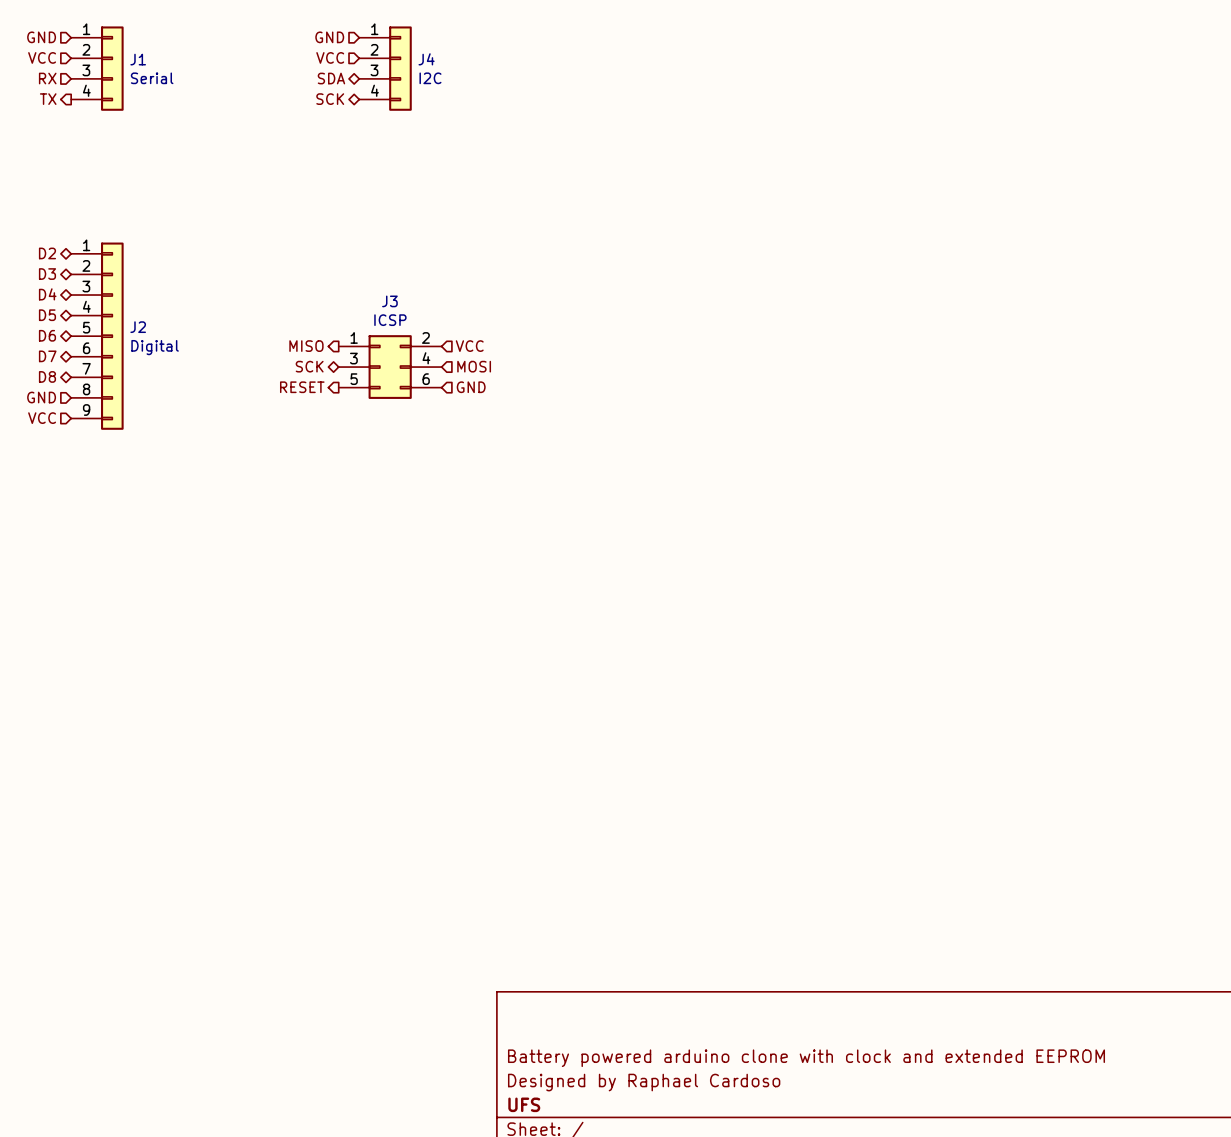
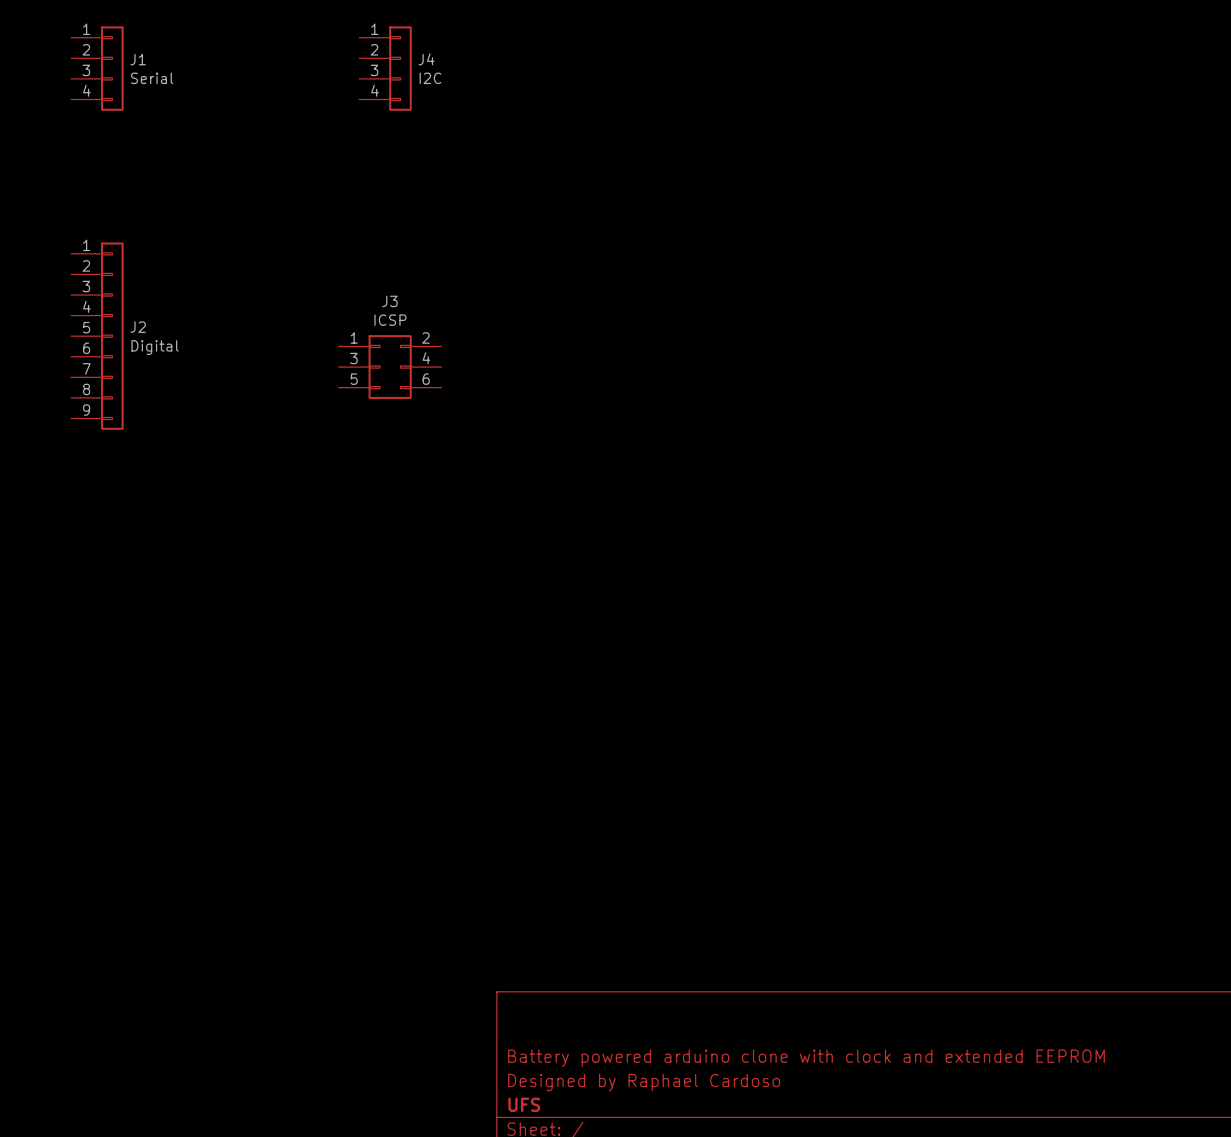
hierarchical label: GND (41, 37) -> none
hierarchical label: GND (329, 37) -> none
hierarchical label: VCC (42, 57) -> none
hierarchical label: VCC (330, 57) -> none
hierarchical label: RX (47, 78) -> none
hierarchical label: SDA (331, 78) -> none
hierarchical label: TX (48, 99) -> none
hierarchical label: SCK (330, 99) -> none
hierarchical label: D2 (47, 253) -> none
hierarchical label: D3 (47, 274) -> none
hierarchical label: D4 (47, 294) -> none
hierarchical label: D5 (47, 315) -> none
hierarchical label: D6 (47, 335) -> none
hierarchical label: MISO (306, 346) -> none
hierarchical label: VCC (469, 346) -> none
hierarchical label: D7 (47, 356) -> none
hierarchical label: SCK (309, 366) -> none
hierarchical label: MOSI (474, 366) -> none
hierarchical label: D8 (47, 376) -> none
hierarchical label: RESET (302, 387) -> none
hierarchical label: GND (471, 387) -> none
hierarchical label: GND (41, 397) -> none
hierarchical label: VCC (42, 418) -> none

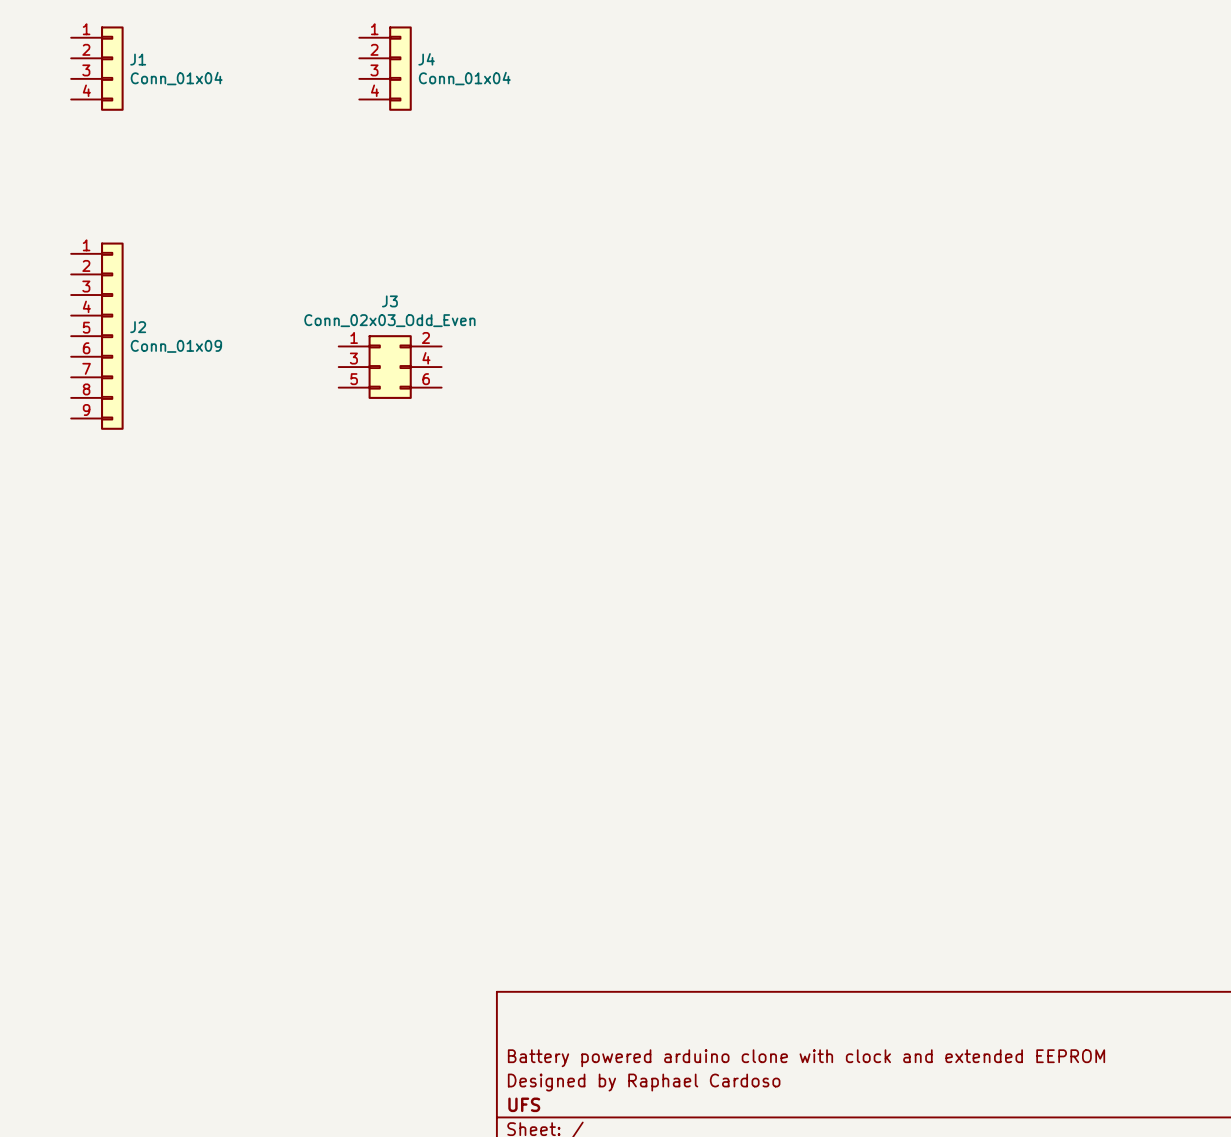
J1 value: Serial (152, 78) -> Conn_01x04 (176, 78)
J4 value: I2C (430, 78) -> Conn_01x04 (464, 78)
J3 value: ICSP (390, 320) -> Conn_02x03_Odd_Even (389, 320)
J2 value: Digital (155, 347) -> Conn_01x09 (176, 346)

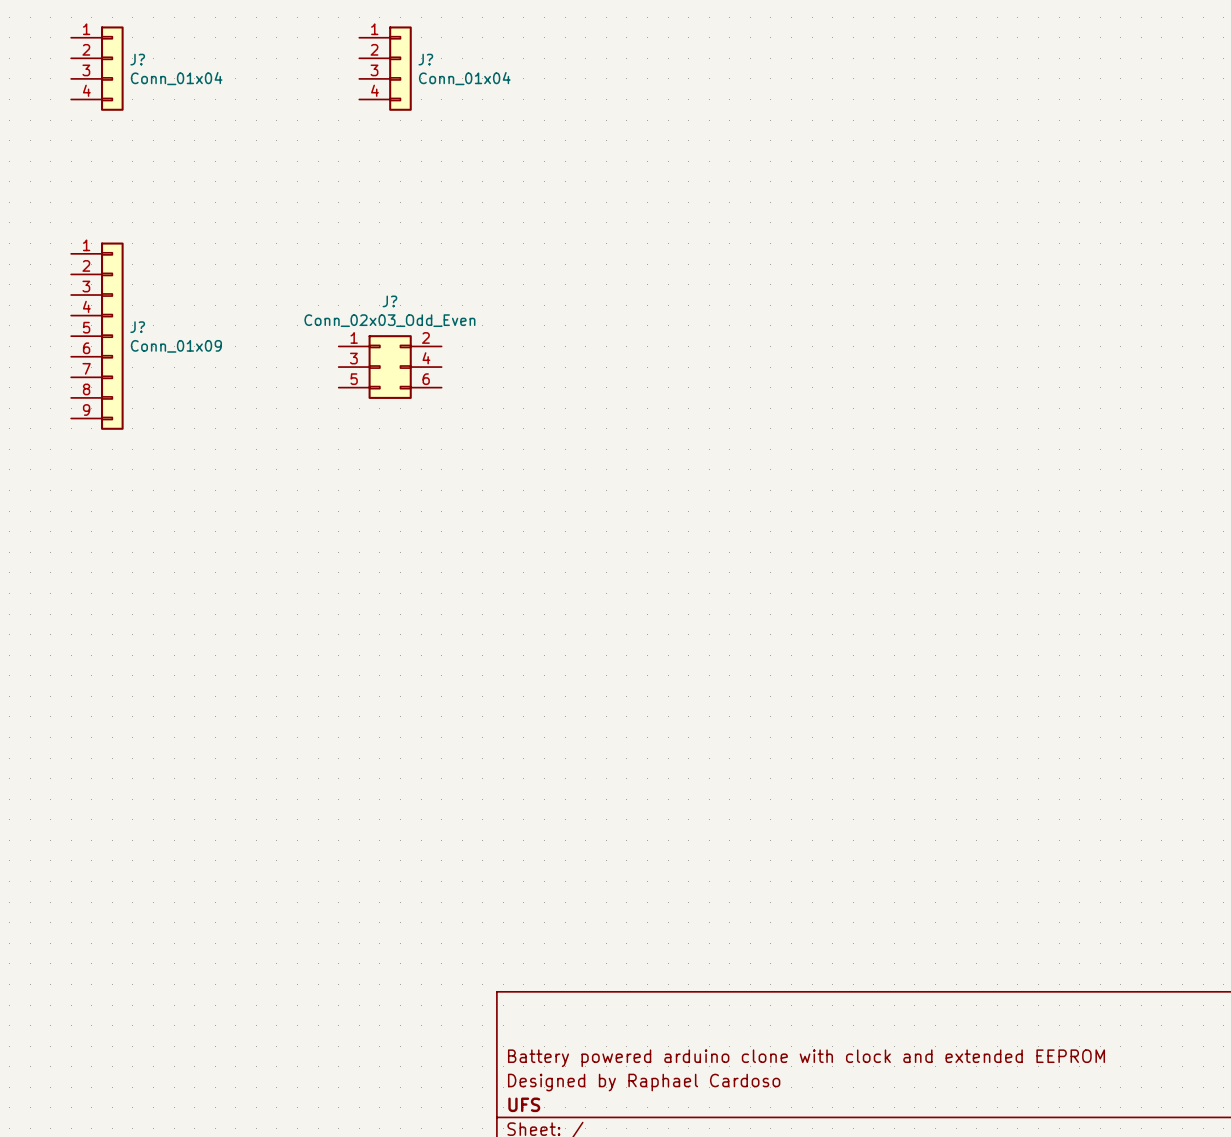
J1 name: J1 (138, 59) -> J? (137, 59)
J4 name: J4 (426, 59) -> J? (425, 59)
J3 name: J3 (389, 301) -> J? (389, 301)
J2 name: J2 (138, 327) -> J? (137, 327)

